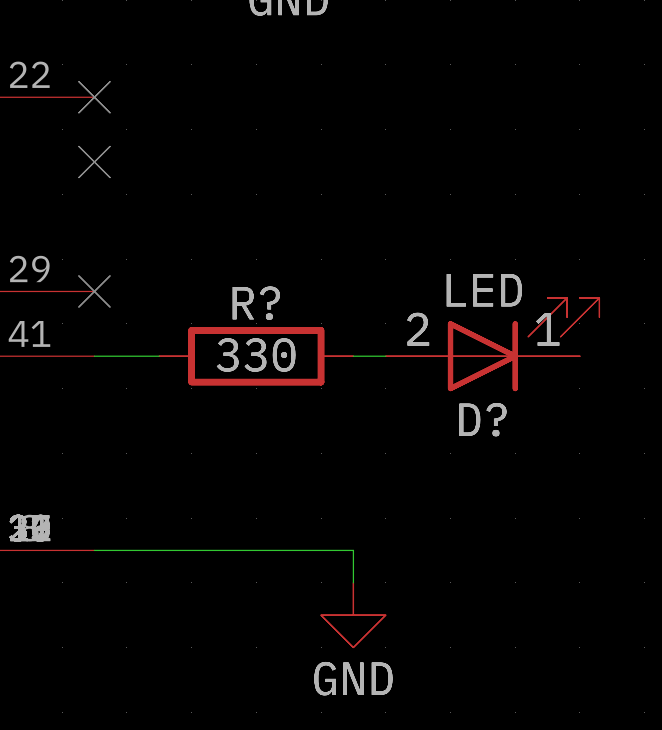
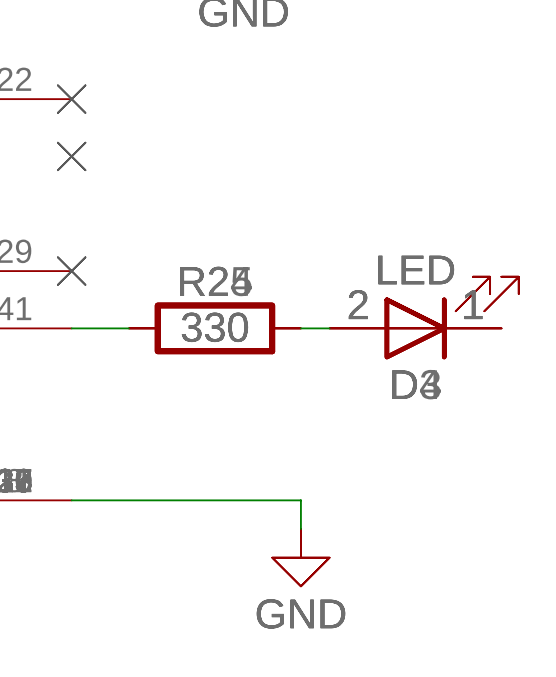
D?: LED (492, 344) -> none
part: none -> LED (424, 318)
part: none -> LED (424, 318)
R?: 330 (256, 356) -> none
part: none -> 330 (214, 328)
part: none -> 330 (214, 328)

